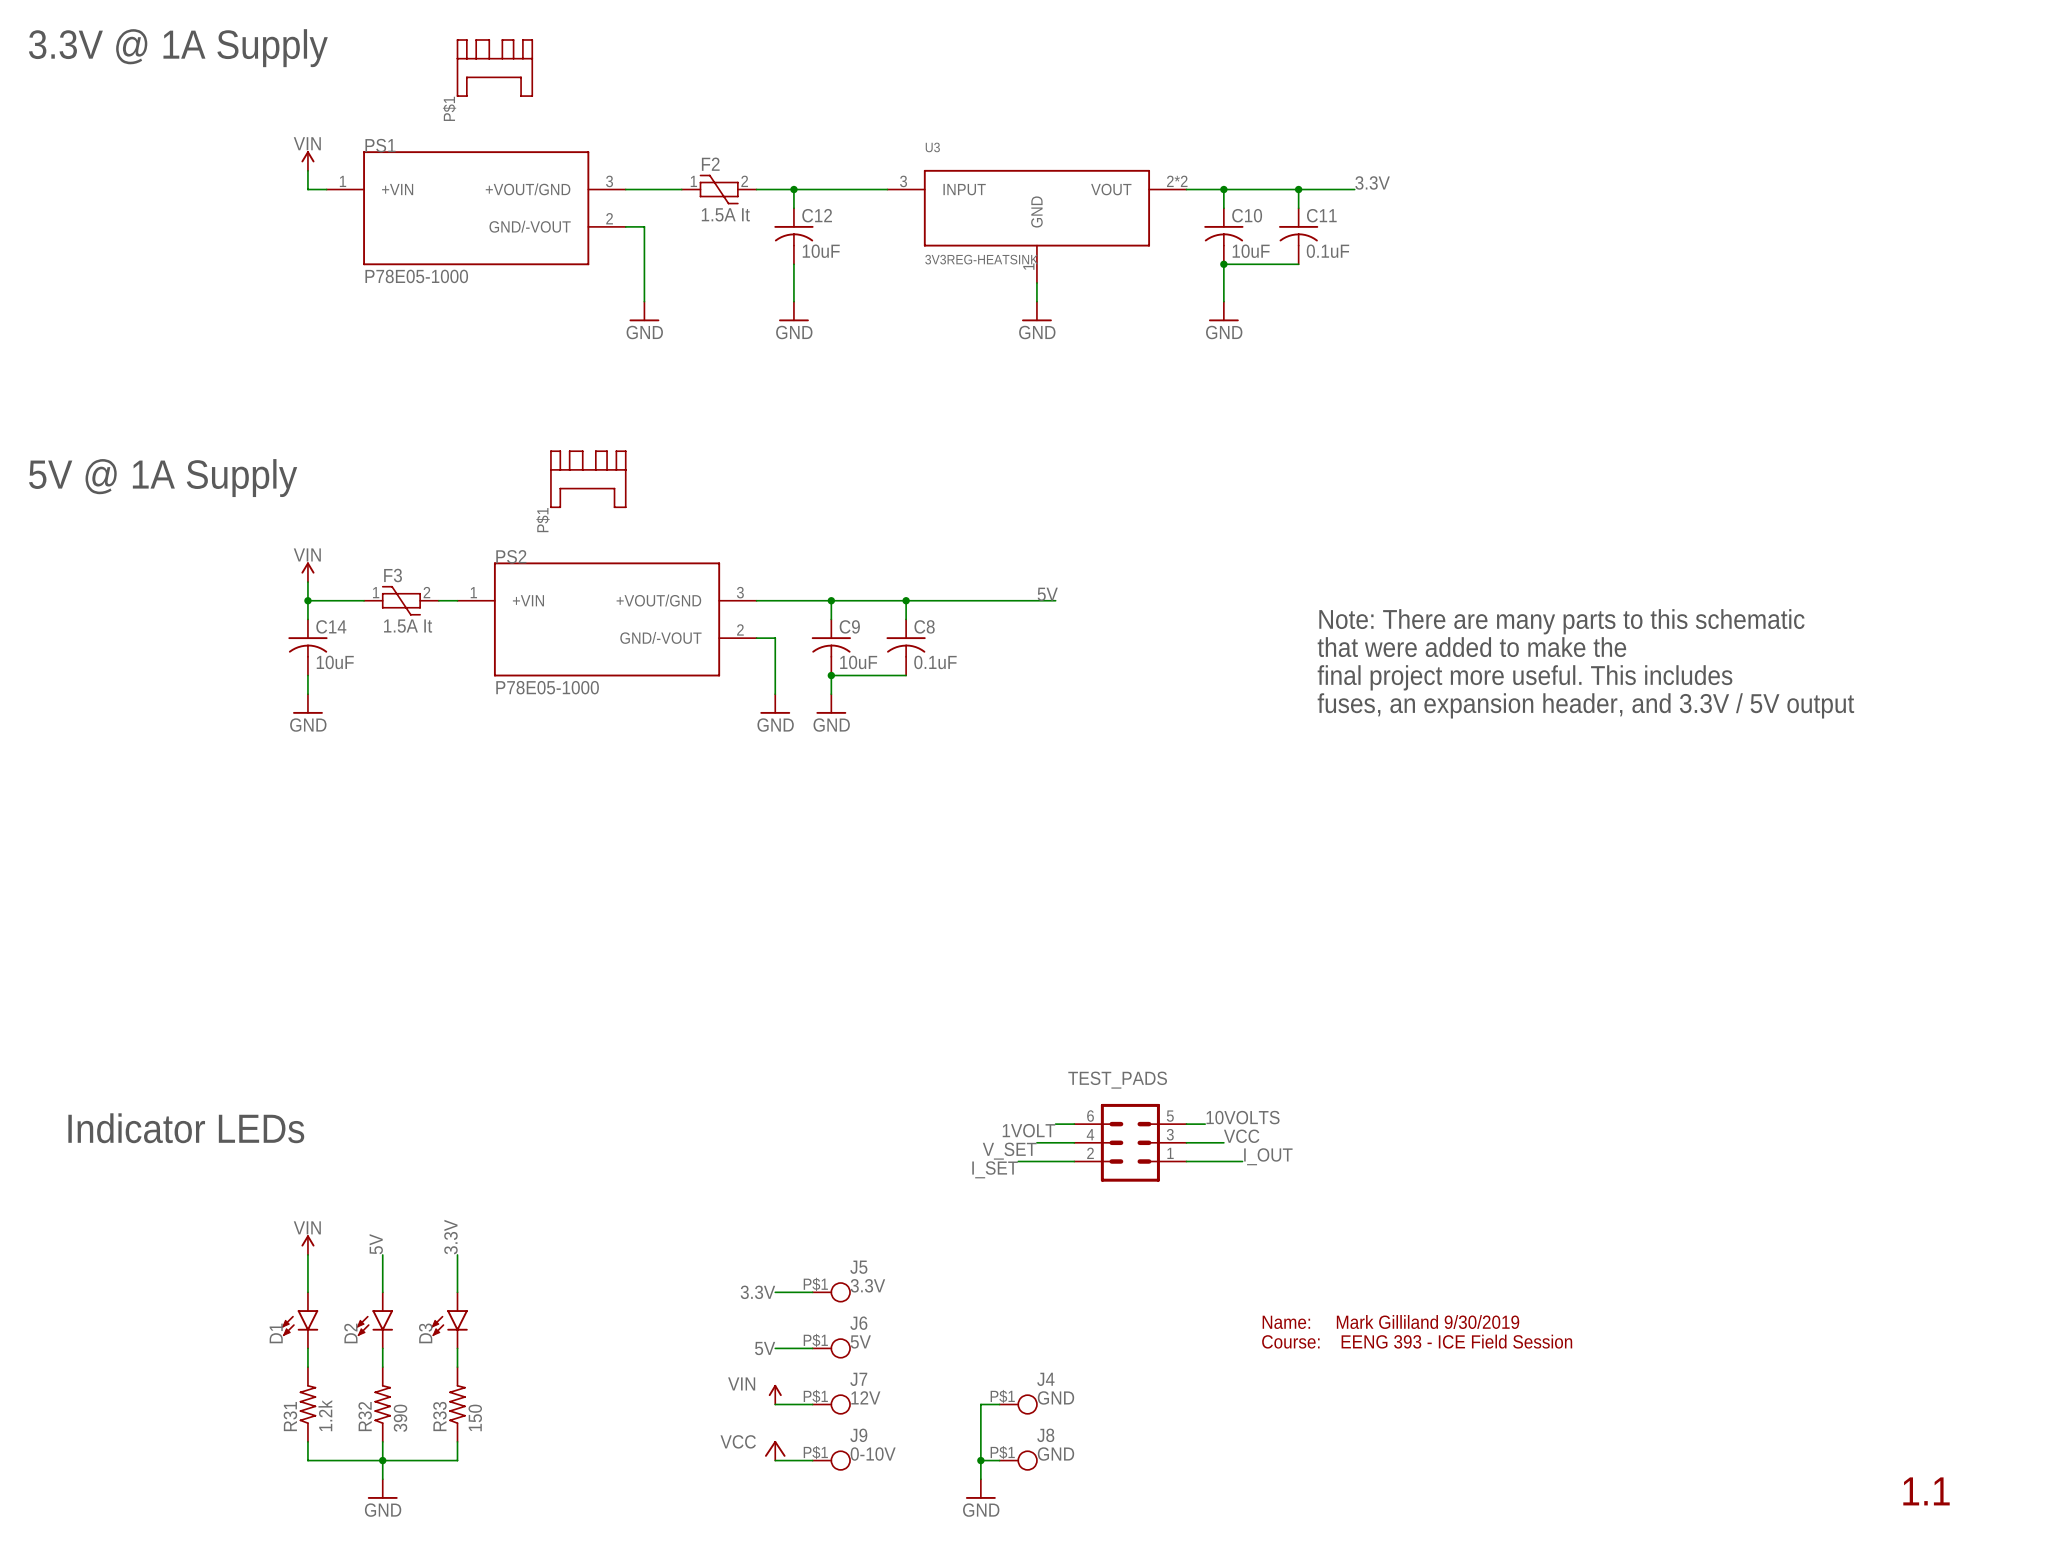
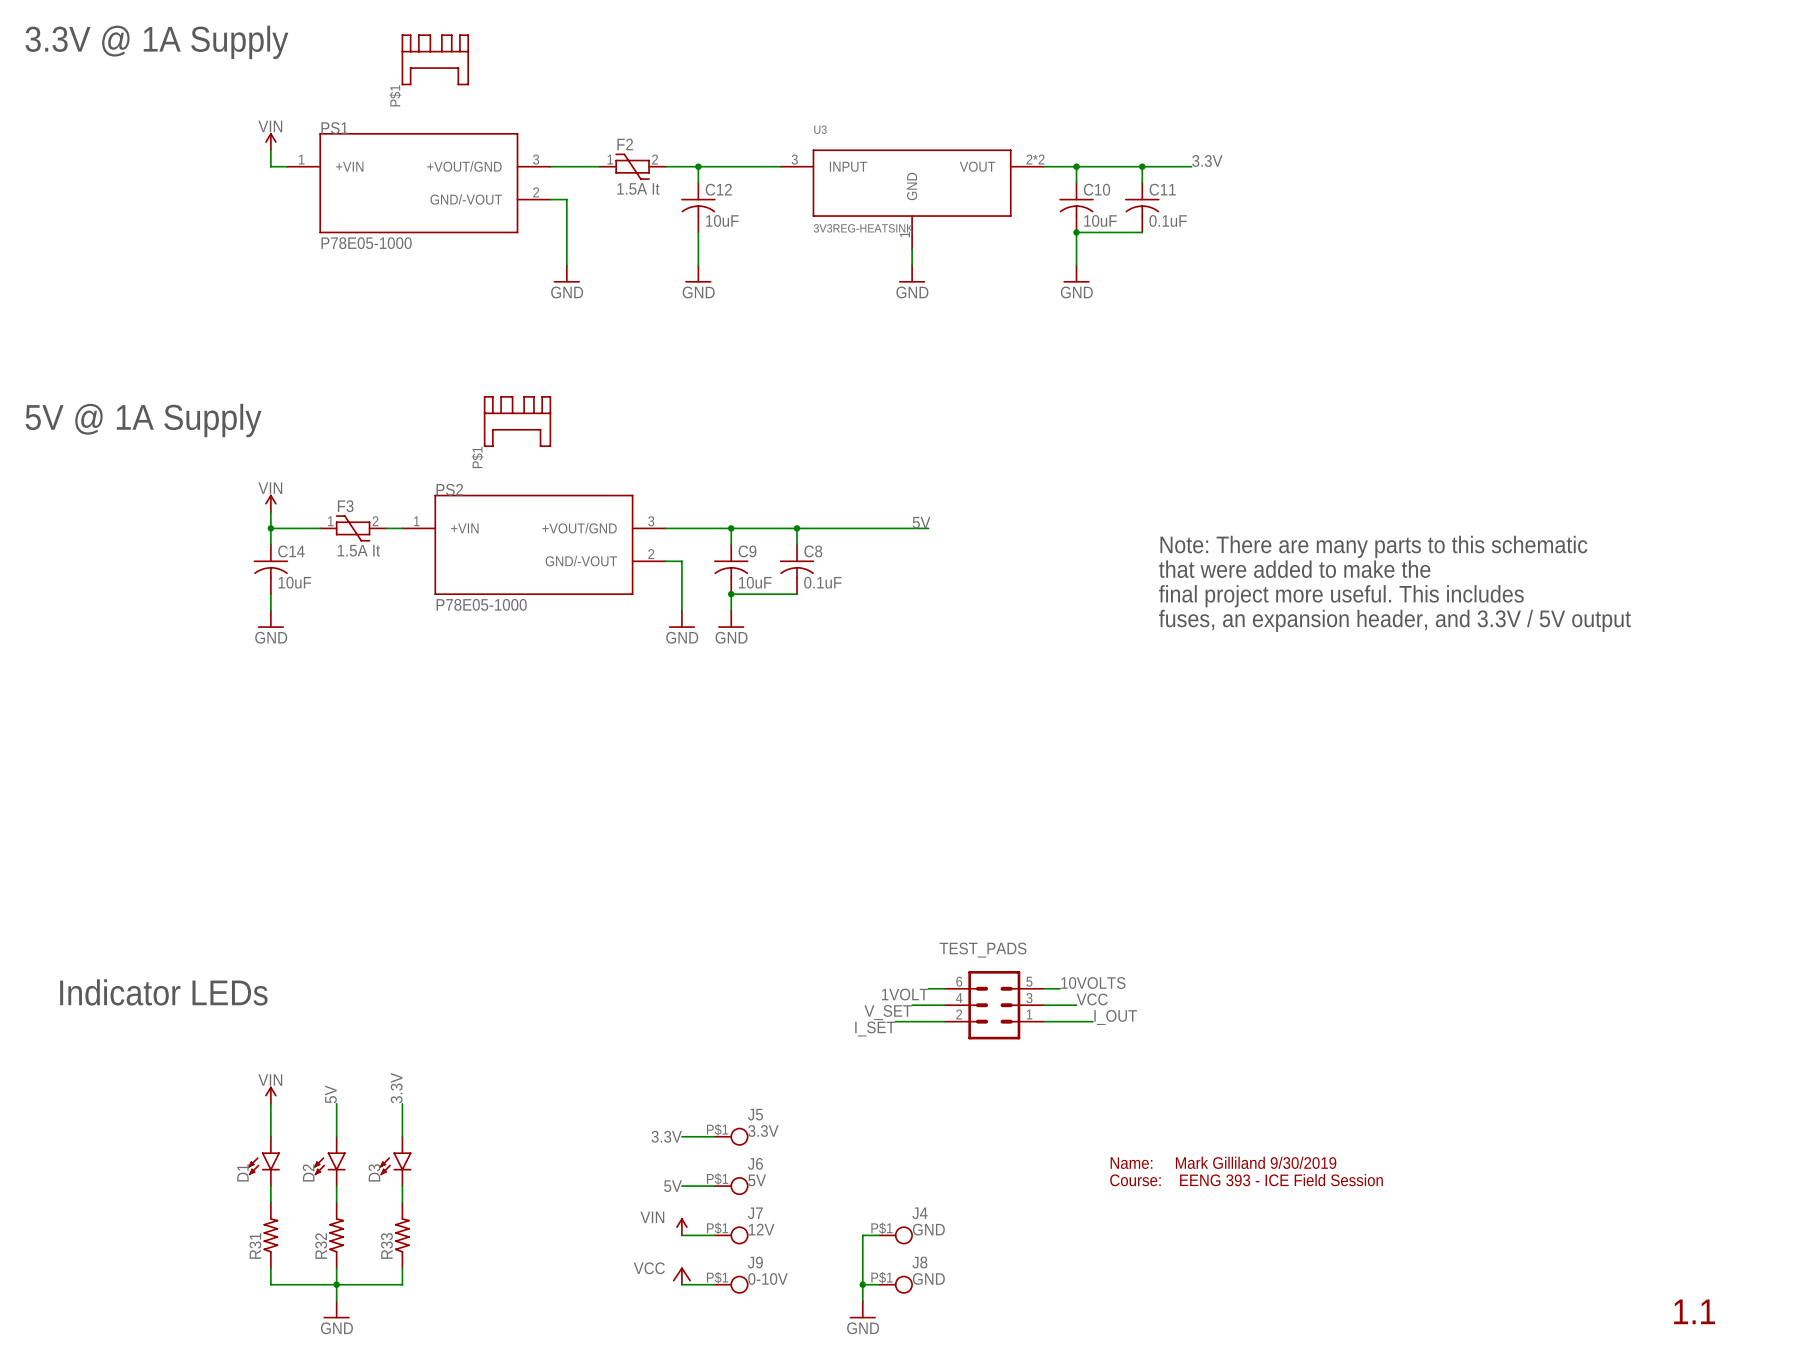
R31 value: 1.2k (325, 1415) -> none
R33 value: 150 (475, 1417) -> none
R32 value: 390 (400, 1418) -> none

